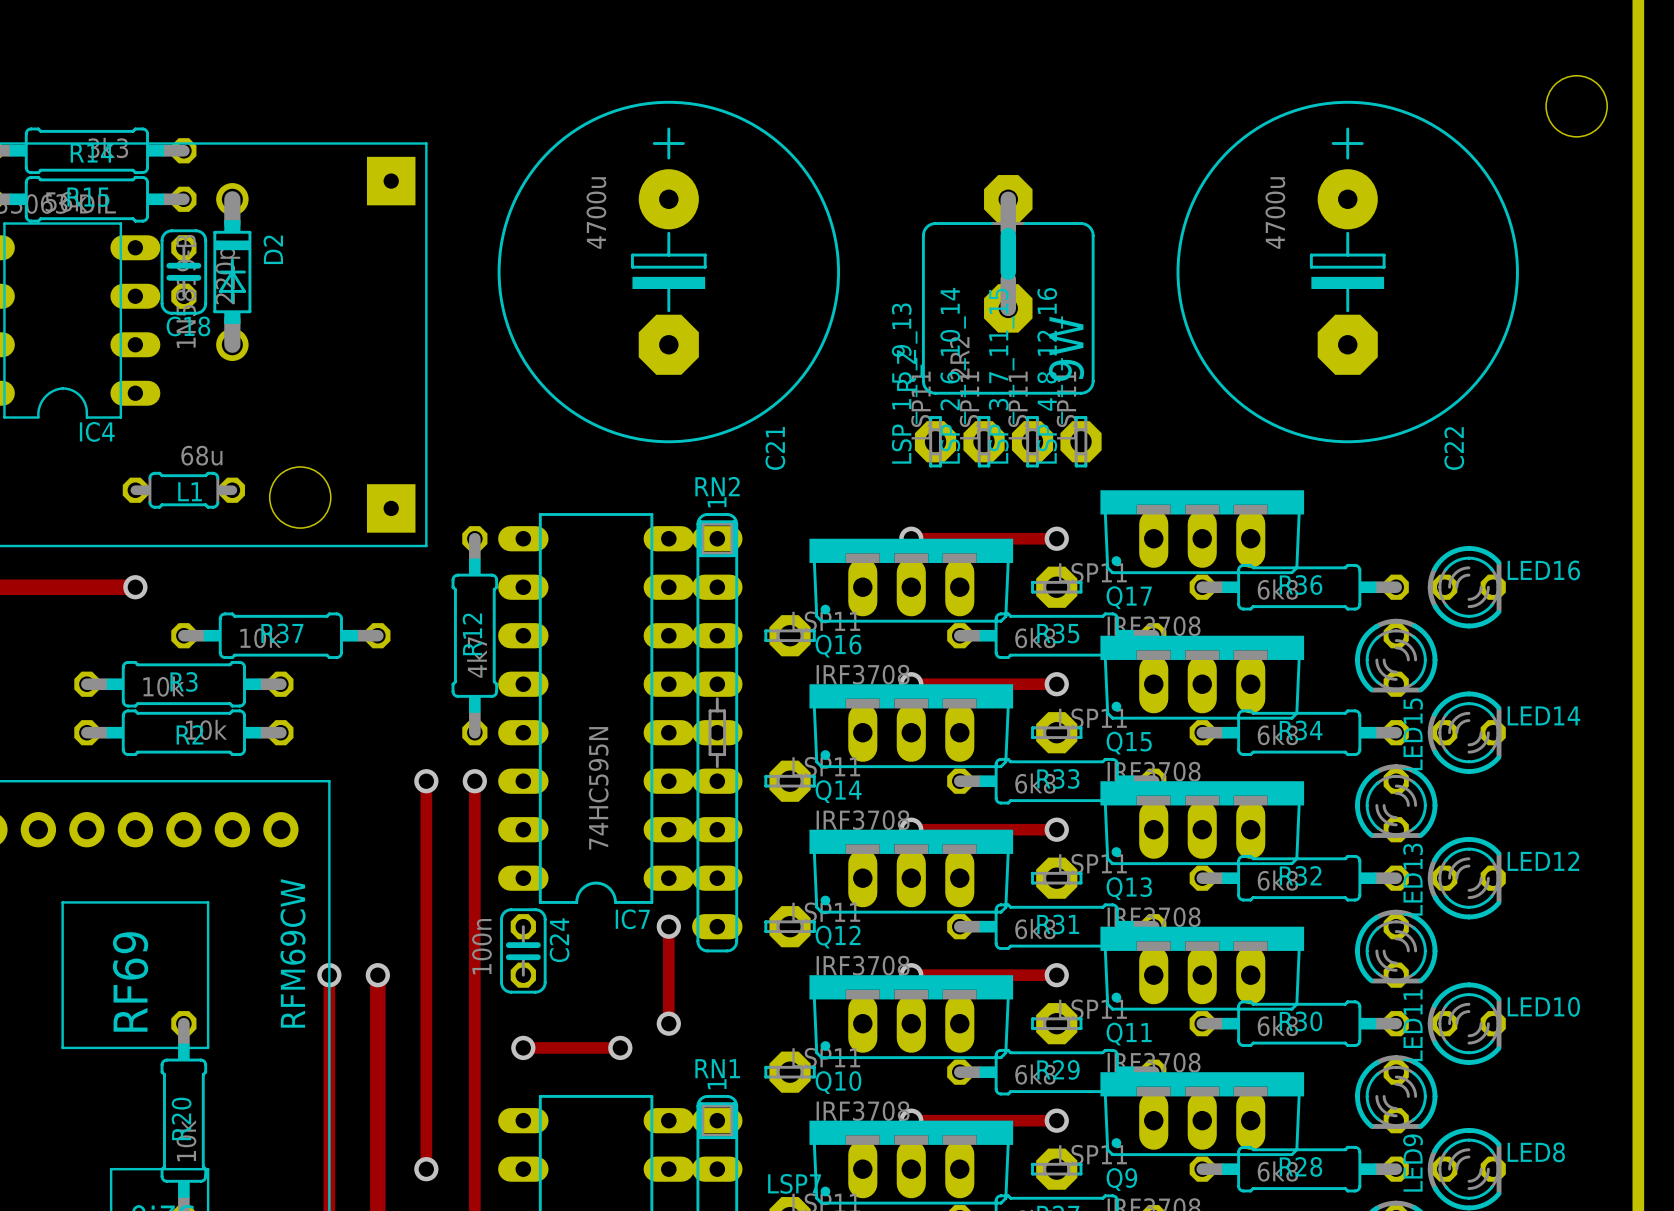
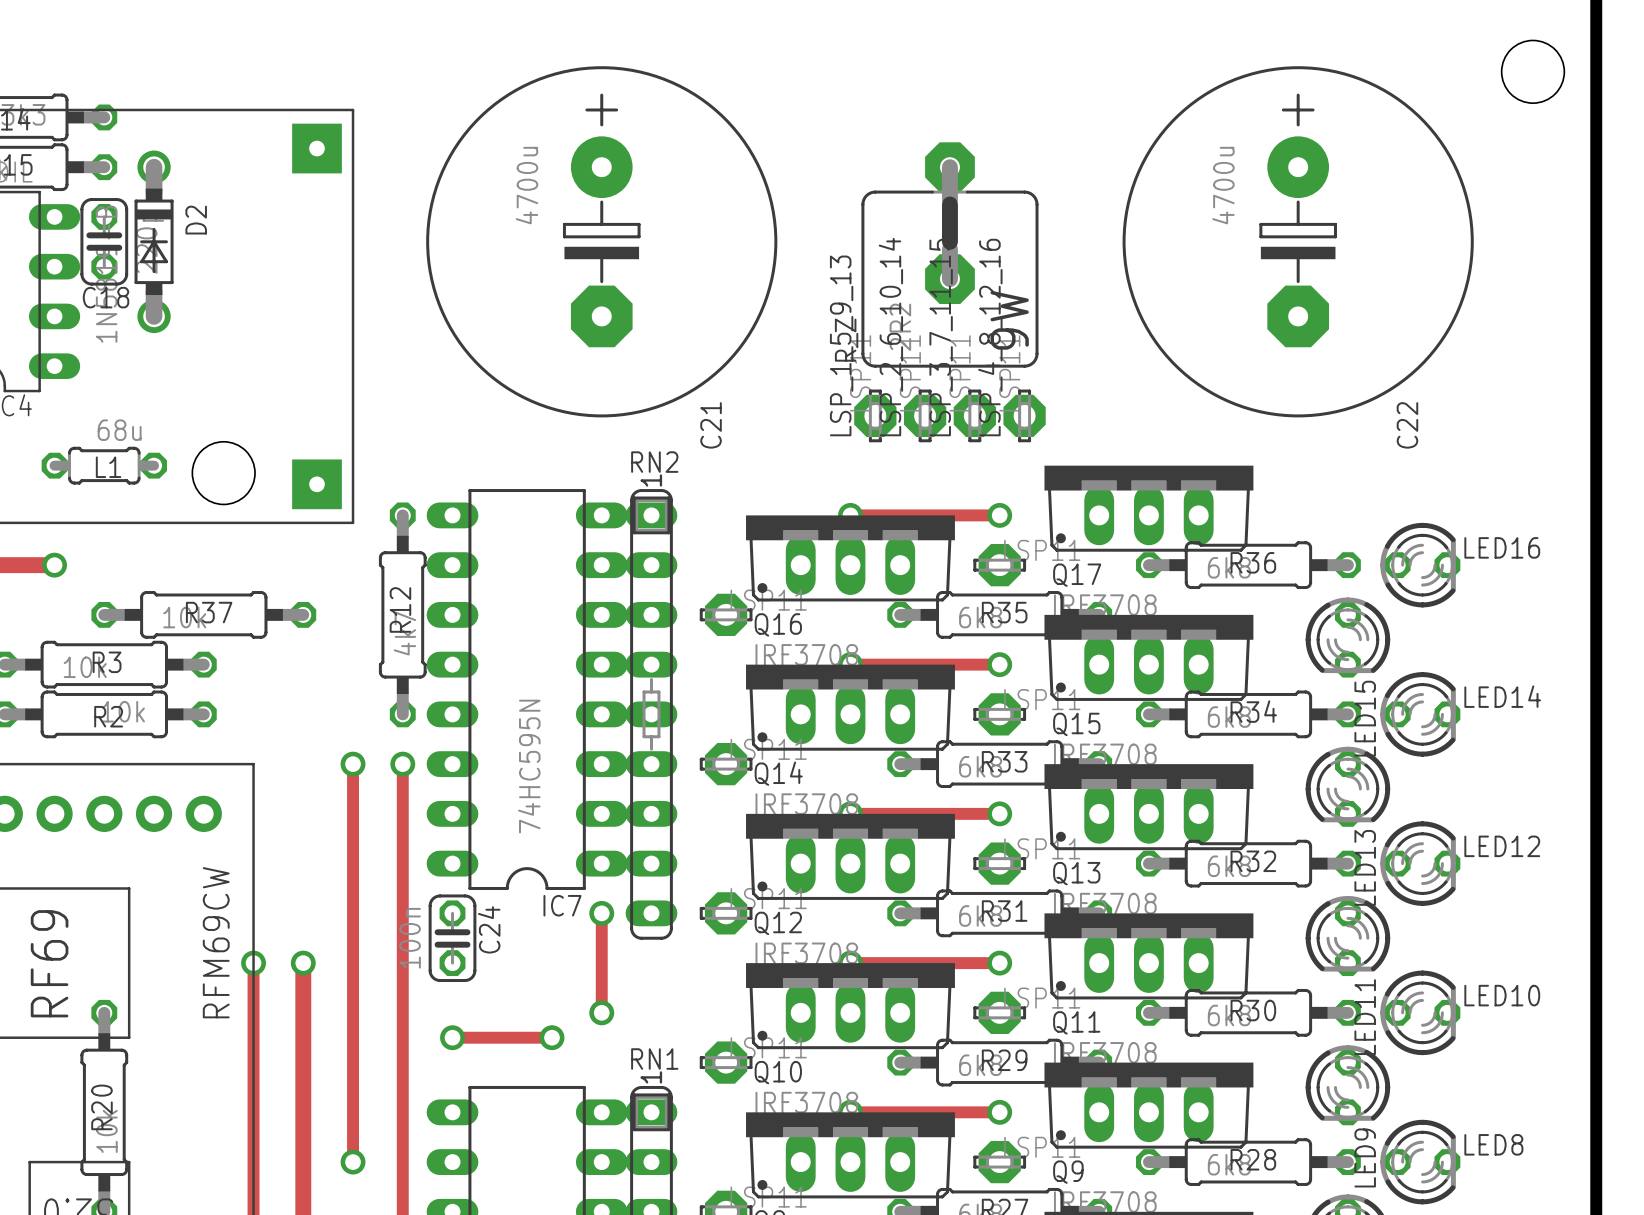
LSP7 name: LSP7 (794, 1183) -> none

